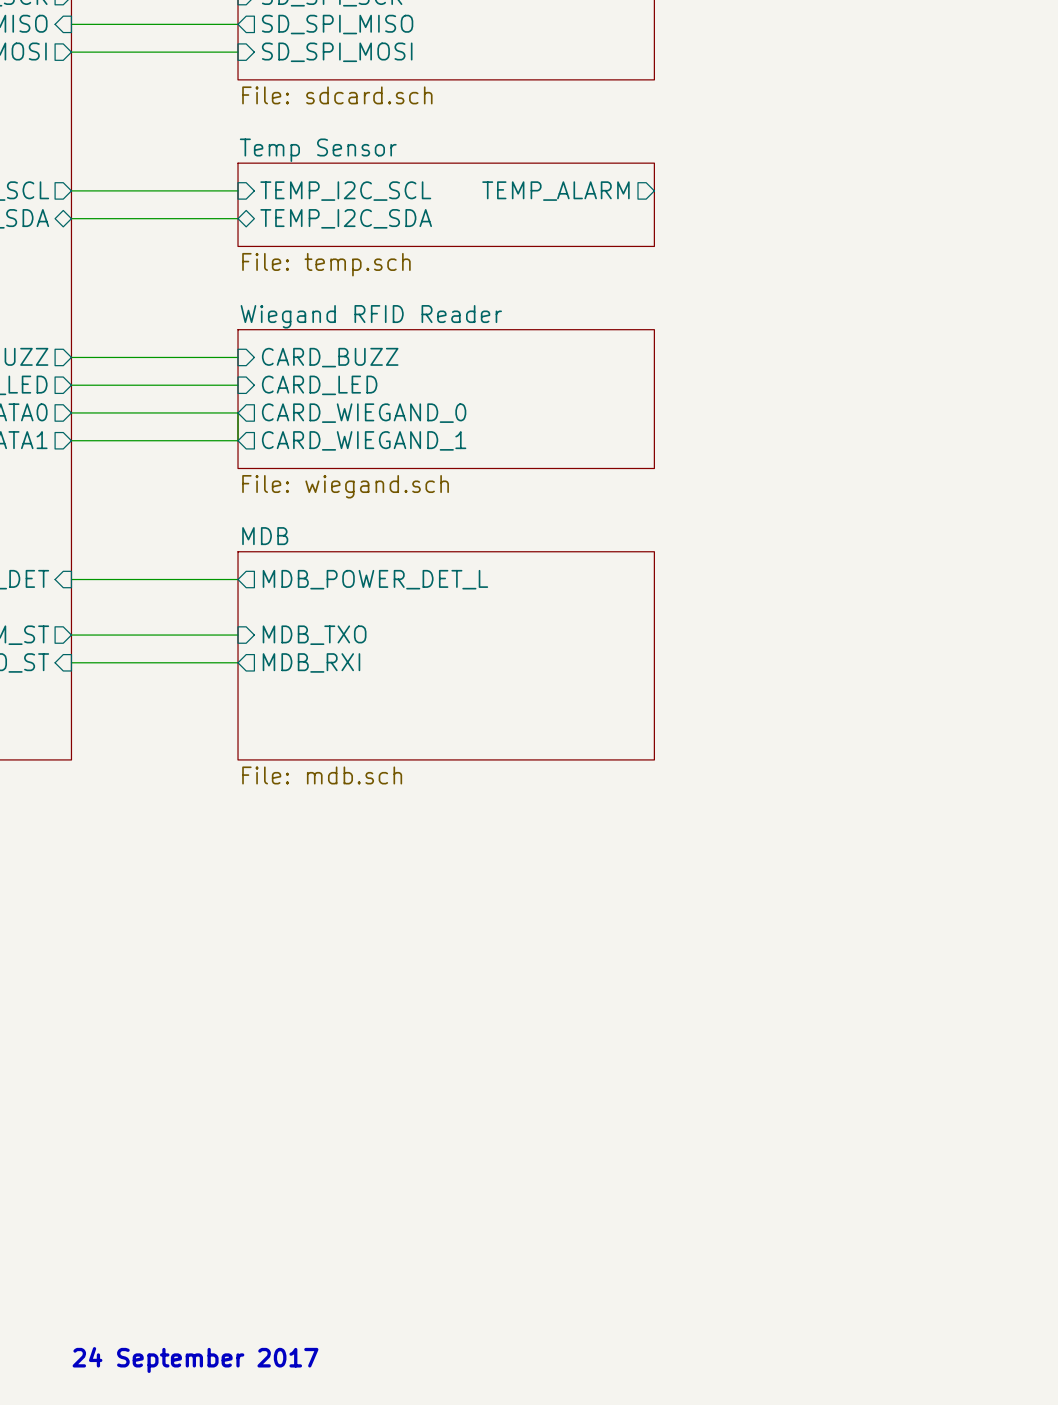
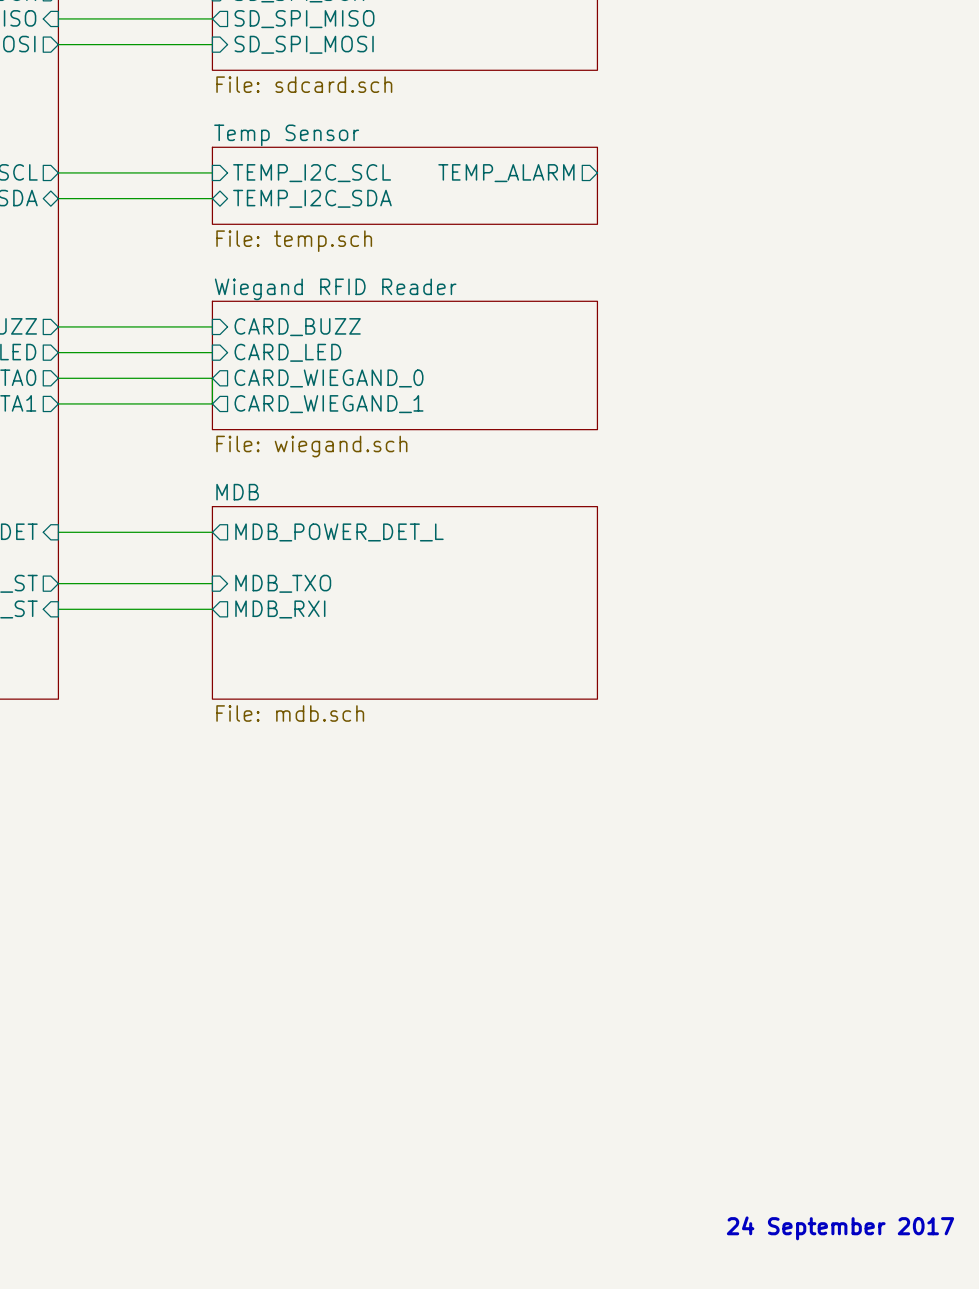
text: none -> 24 September 2017 (840, 1228)
text: 24 September 2017 (195, 1360) -> none

